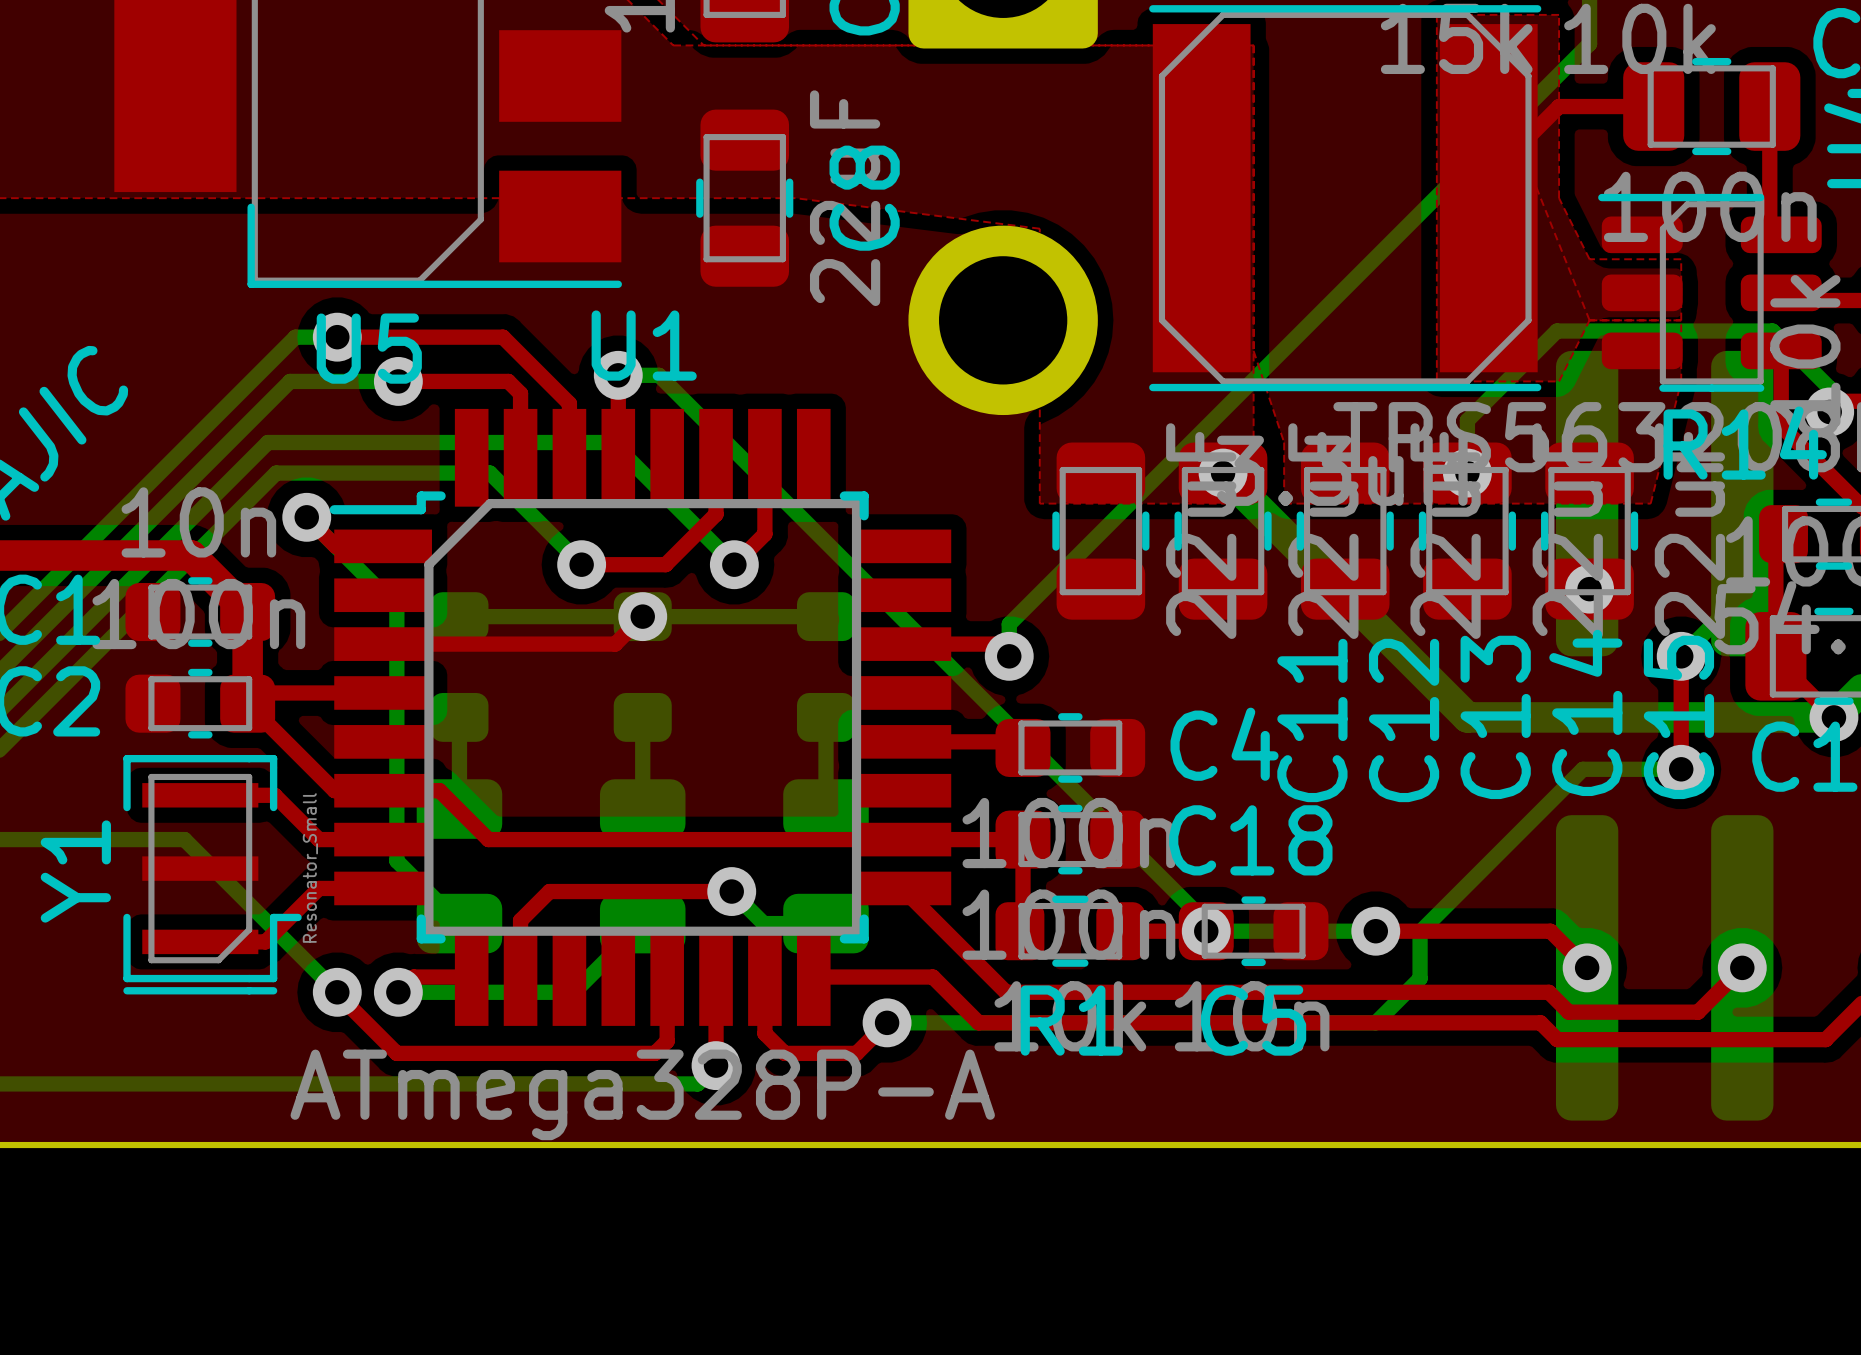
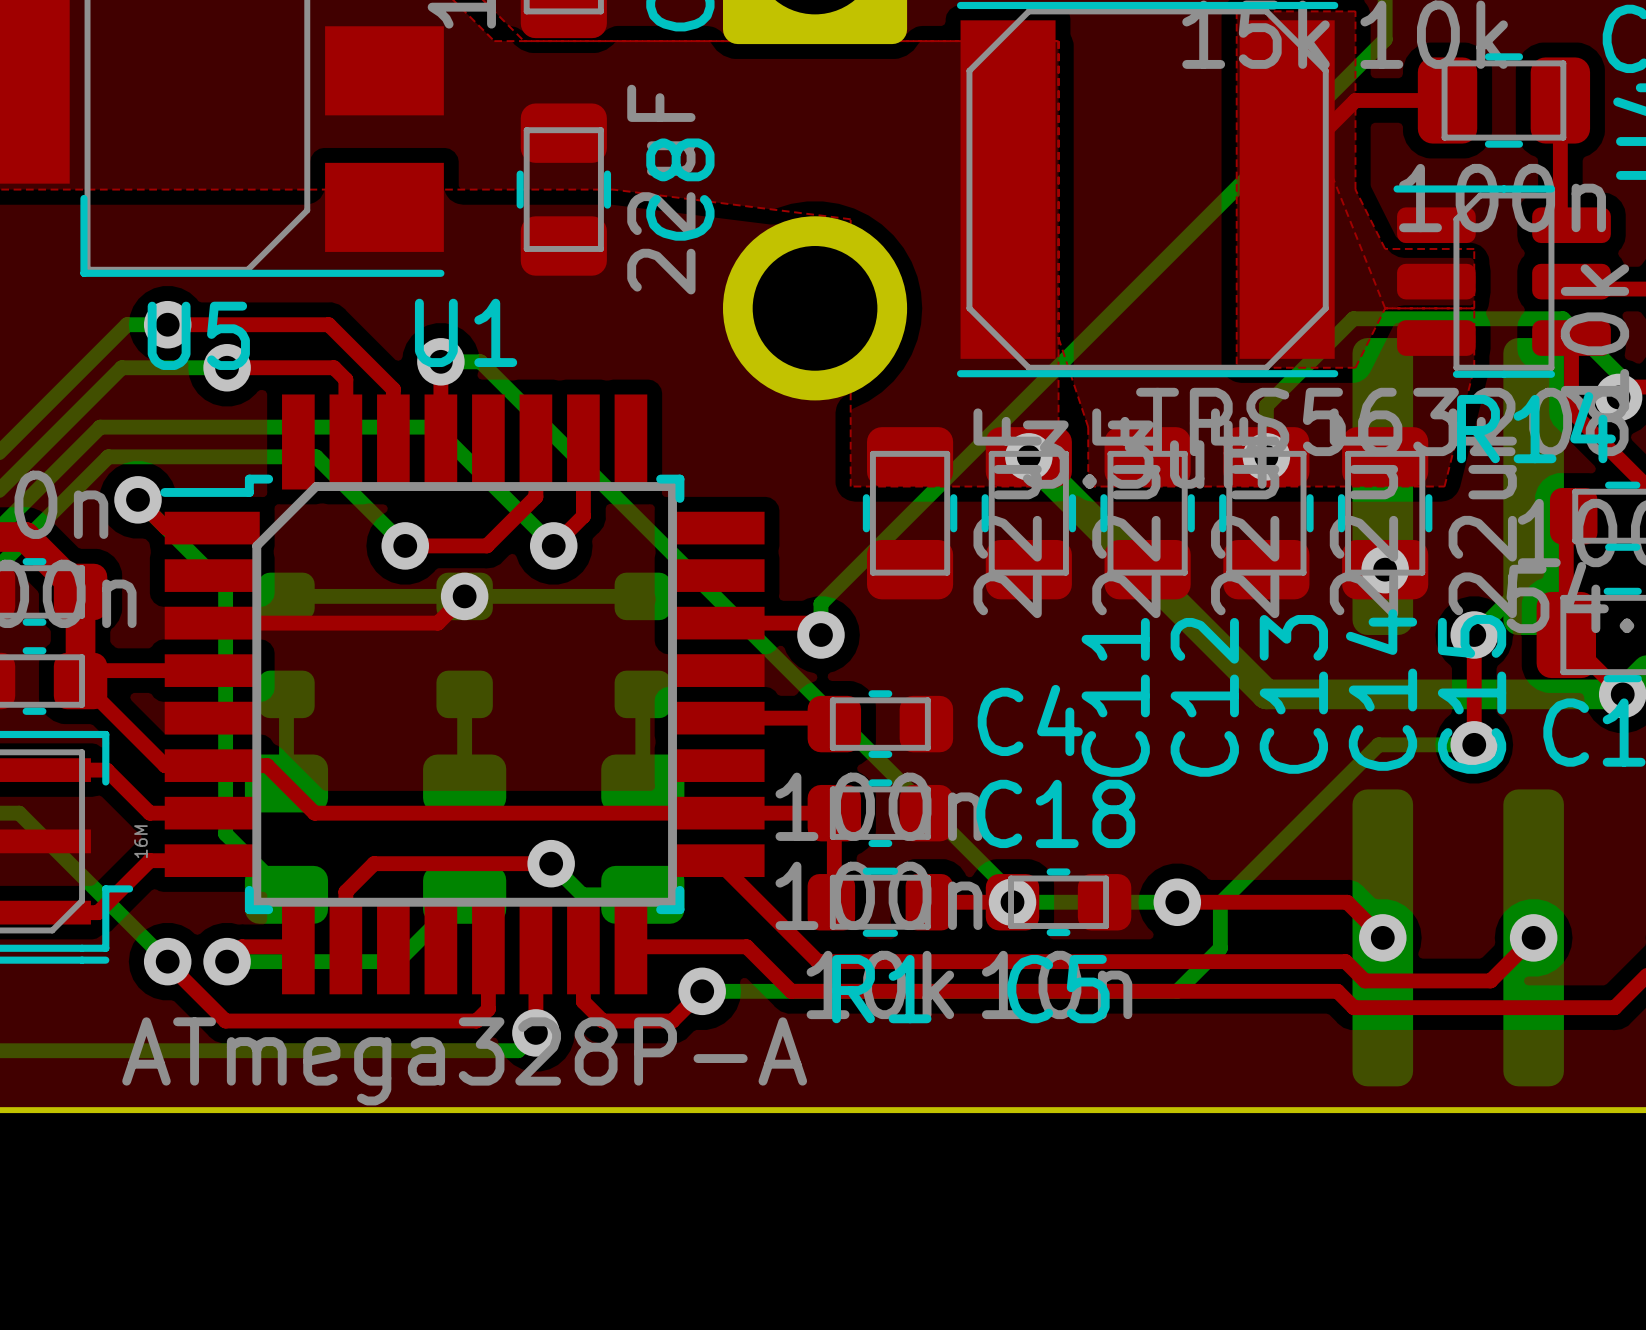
Y1 value: Resonator_Small (310, 868) -> 16M (140, 841)

